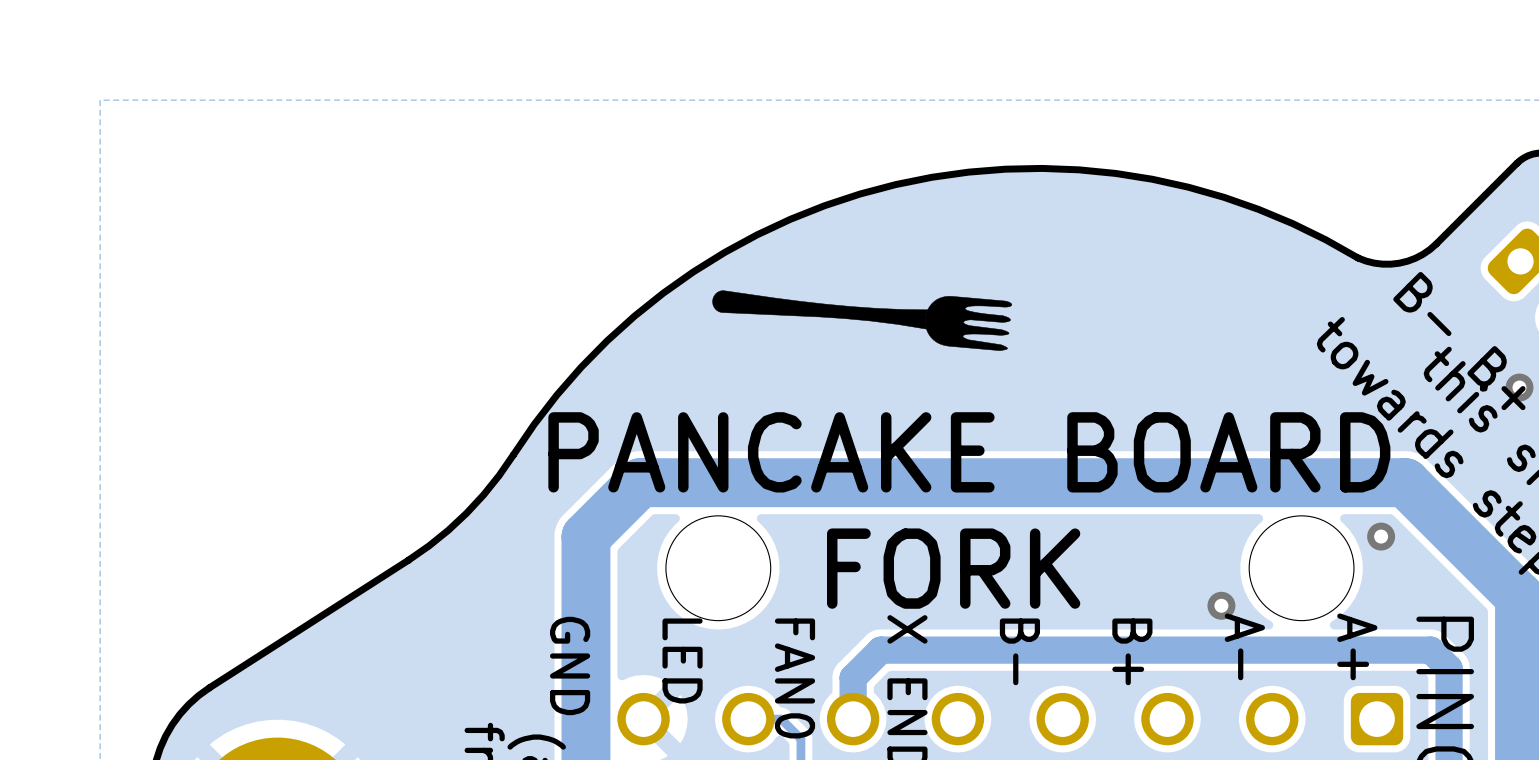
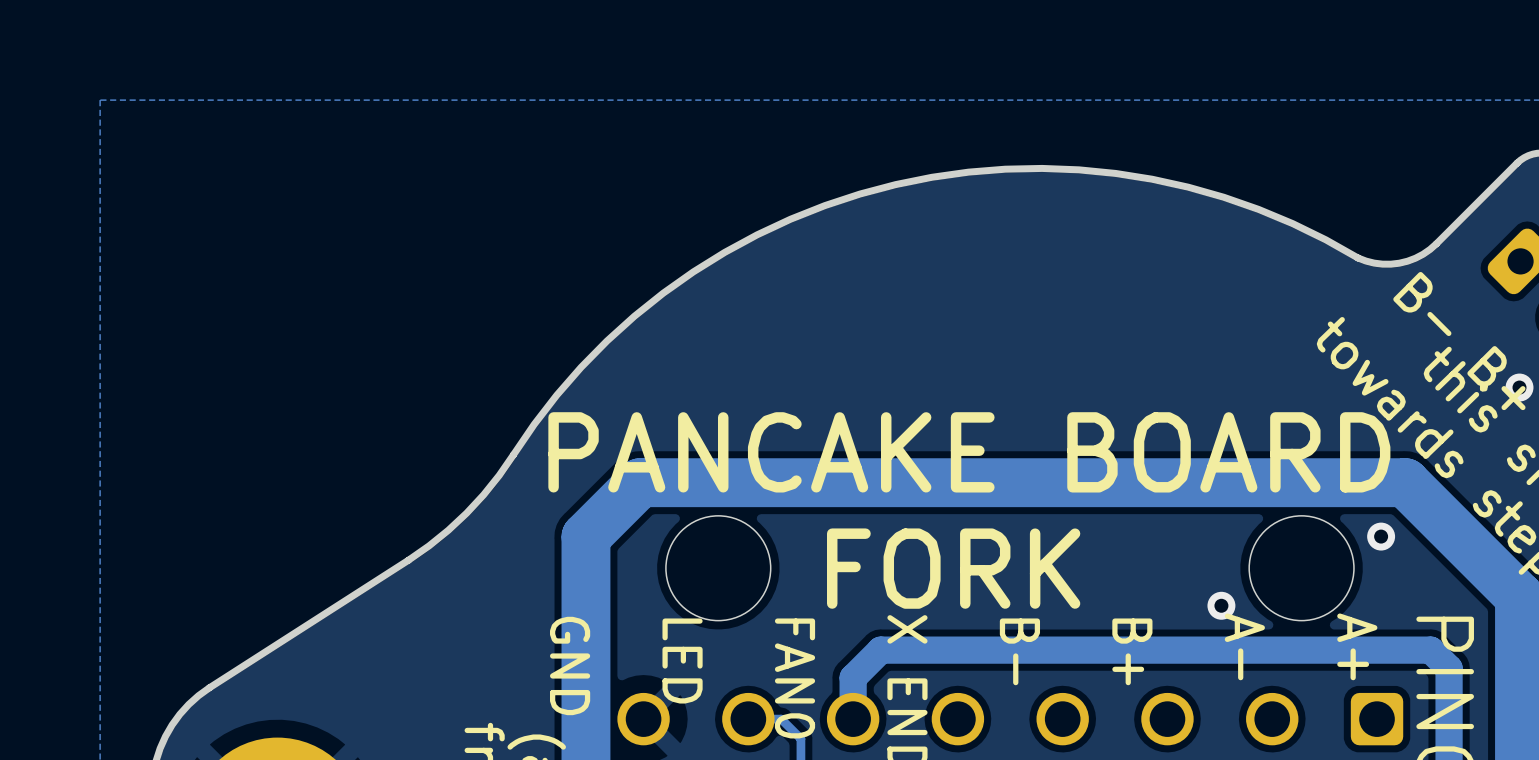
drawing: [712, 290, 1013, 351] -> none

